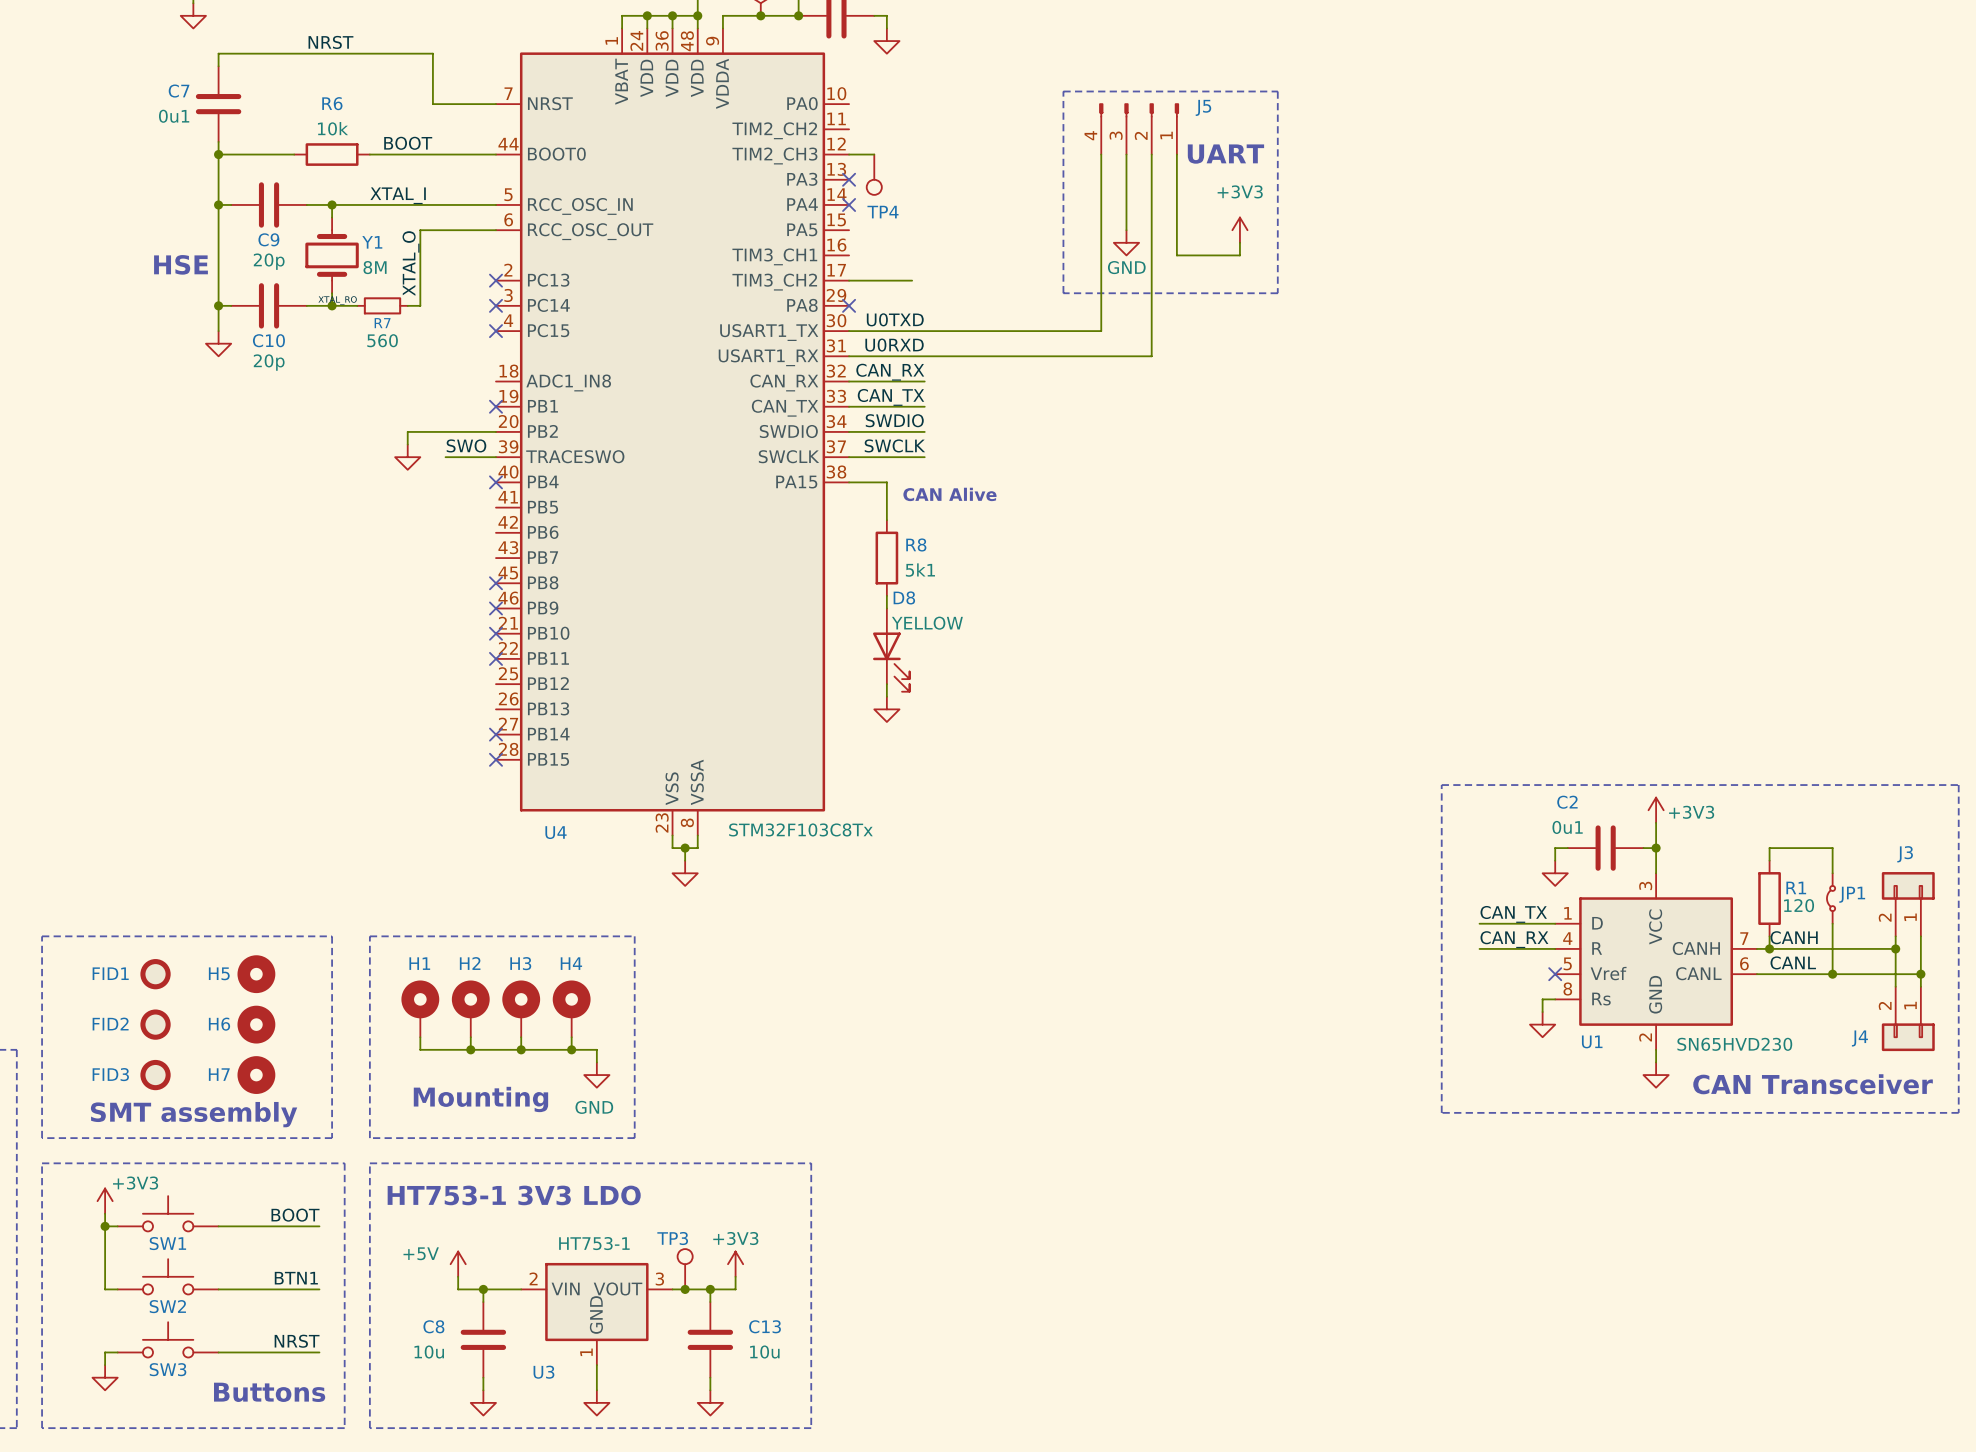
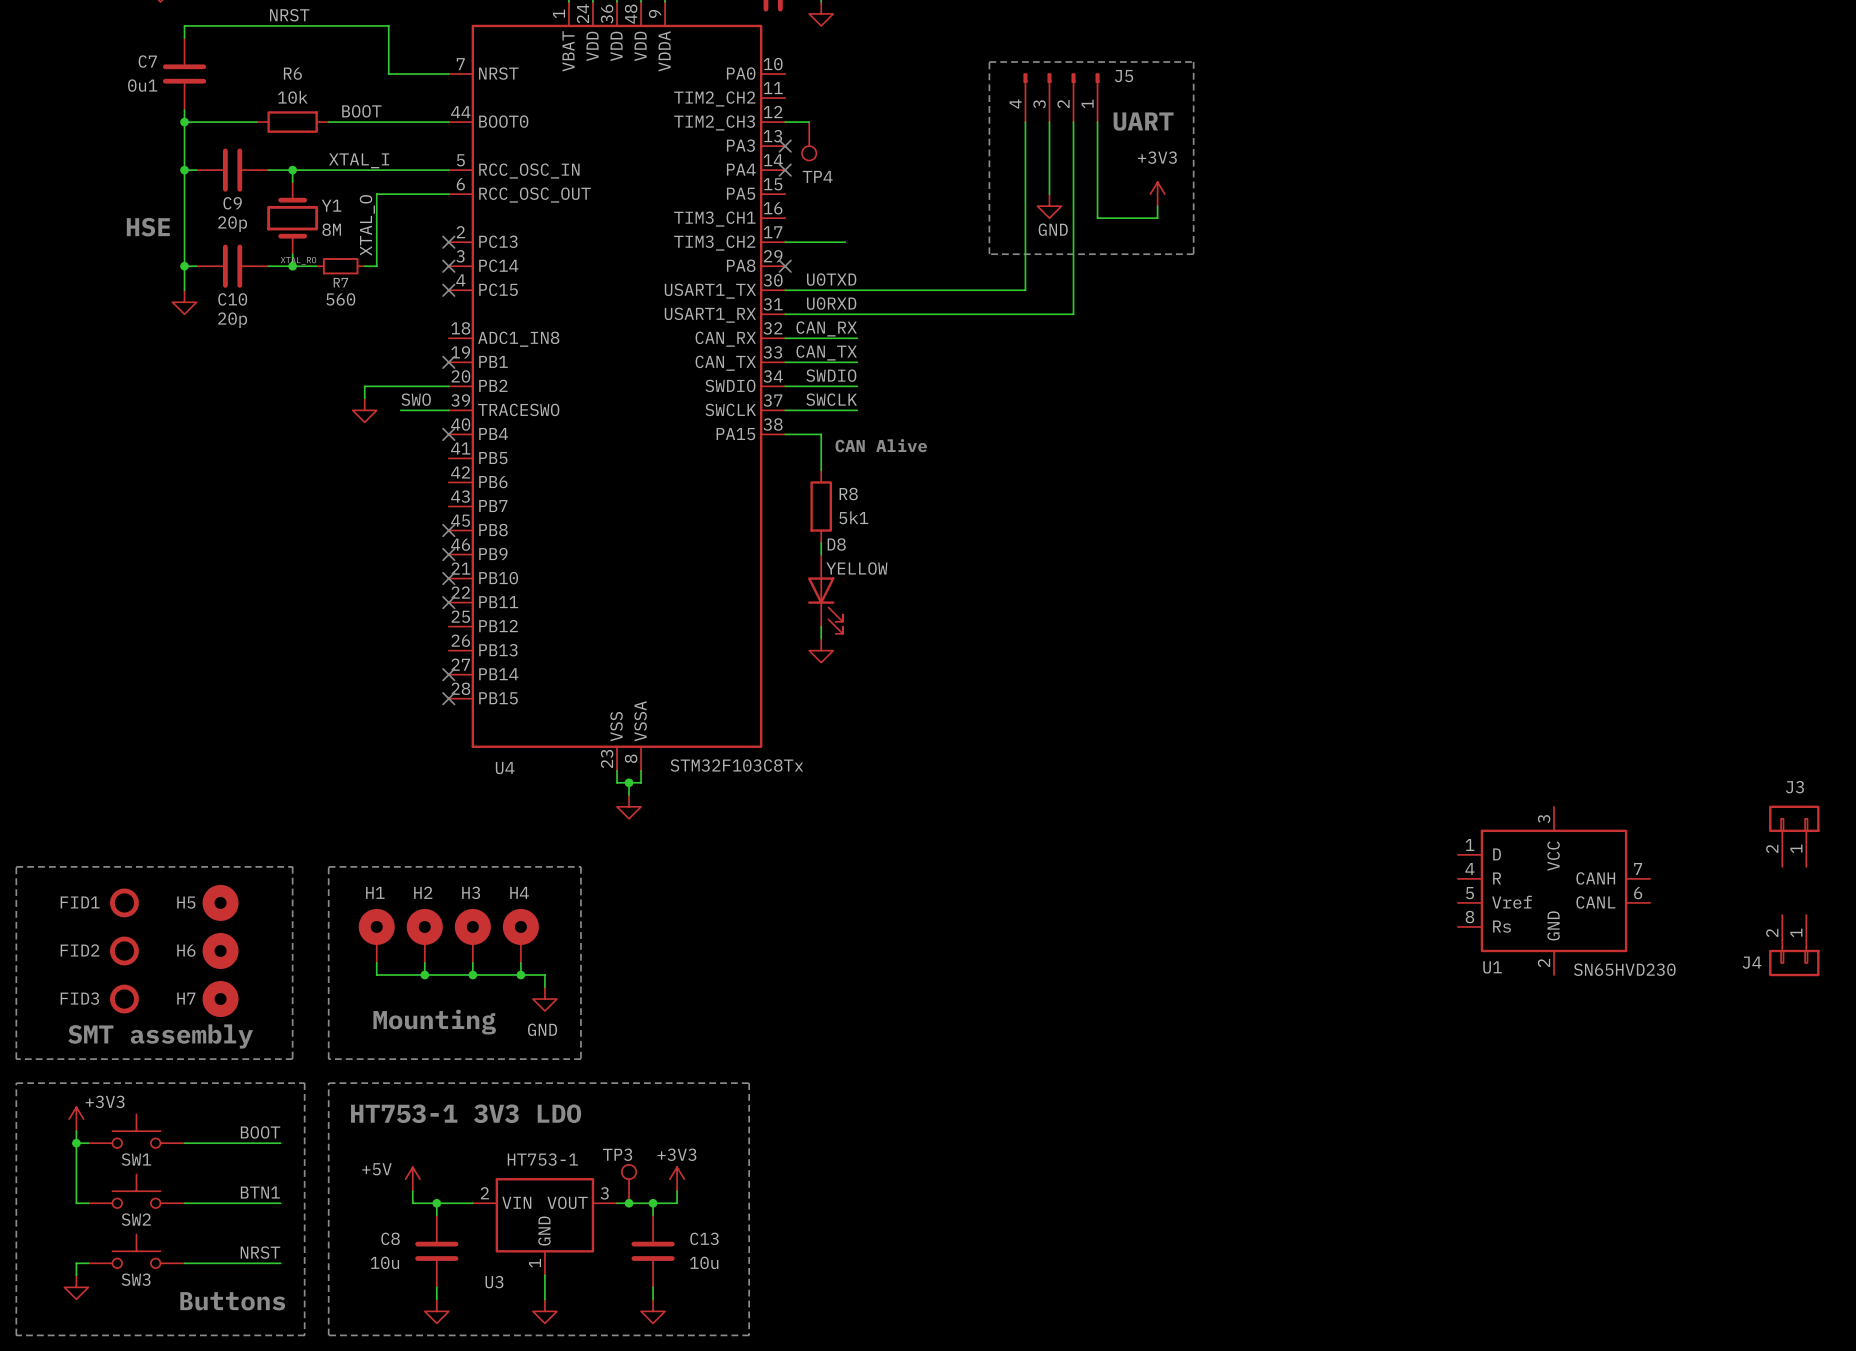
line: (1441, 785) (1958, 785) (1958, 1112) (1441, 1112) (1441, 785) -> none
power symbol: +3V3 (1656, 810) -> none
wire: (1656, 822) (1656, 873) -> none
wire: (1567, 848) (1555, 848) (1555, 860) -> none
C2: 0u1 (1605, 848) -> none
wire: (1643, 848) (1656, 848) -> none
junction: (1656, 848) -> none
wire: (1769, 860) (1769, 848) (1832, 848) (1832, 873) -> none
power symbol: (1555, 873) -> none
R1: 120 (1769, 898) -> none
JP1: (1831, 898) -> none
label: CAN_TX (1513, 914) -> none
wire: (1479, 923) (1555, 923) -> none
wire: (1832, 923) (1832, 974) -> none
wire: (1769, 936) (1769, 948) -> none
wire: (1895, 936) (1895, 986) -> none
wire: (1920, 936) (1920, 986) -> none
label: CANH (1794, 937) -> none
label: CAN_RX (1514, 939) -> none
wire: (1479, 948) (1555, 948) -> none
wire: (1756, 948) (1895, 948) -> none
junction: (1769, 948) -> none
junction: (1895, 948) -> none
label: CANL (1793, 962) -> none
no-connect mark: (1555, 974) -> none
wire: (1756, 974) (1920, 974) -> none
junction: (1832, 974) -> none
junction: (1920, 974) -> none
wire: (1555, 999) (1542, 999) (1542, 1012) -> none
power symbol: (1542, 1024) -> none
wire: (1656, 1049) (1656, 1062) -> none
power symbol: (1656, 1075) -> none
text: CAN Transceiver (1813, 1084) -> none

